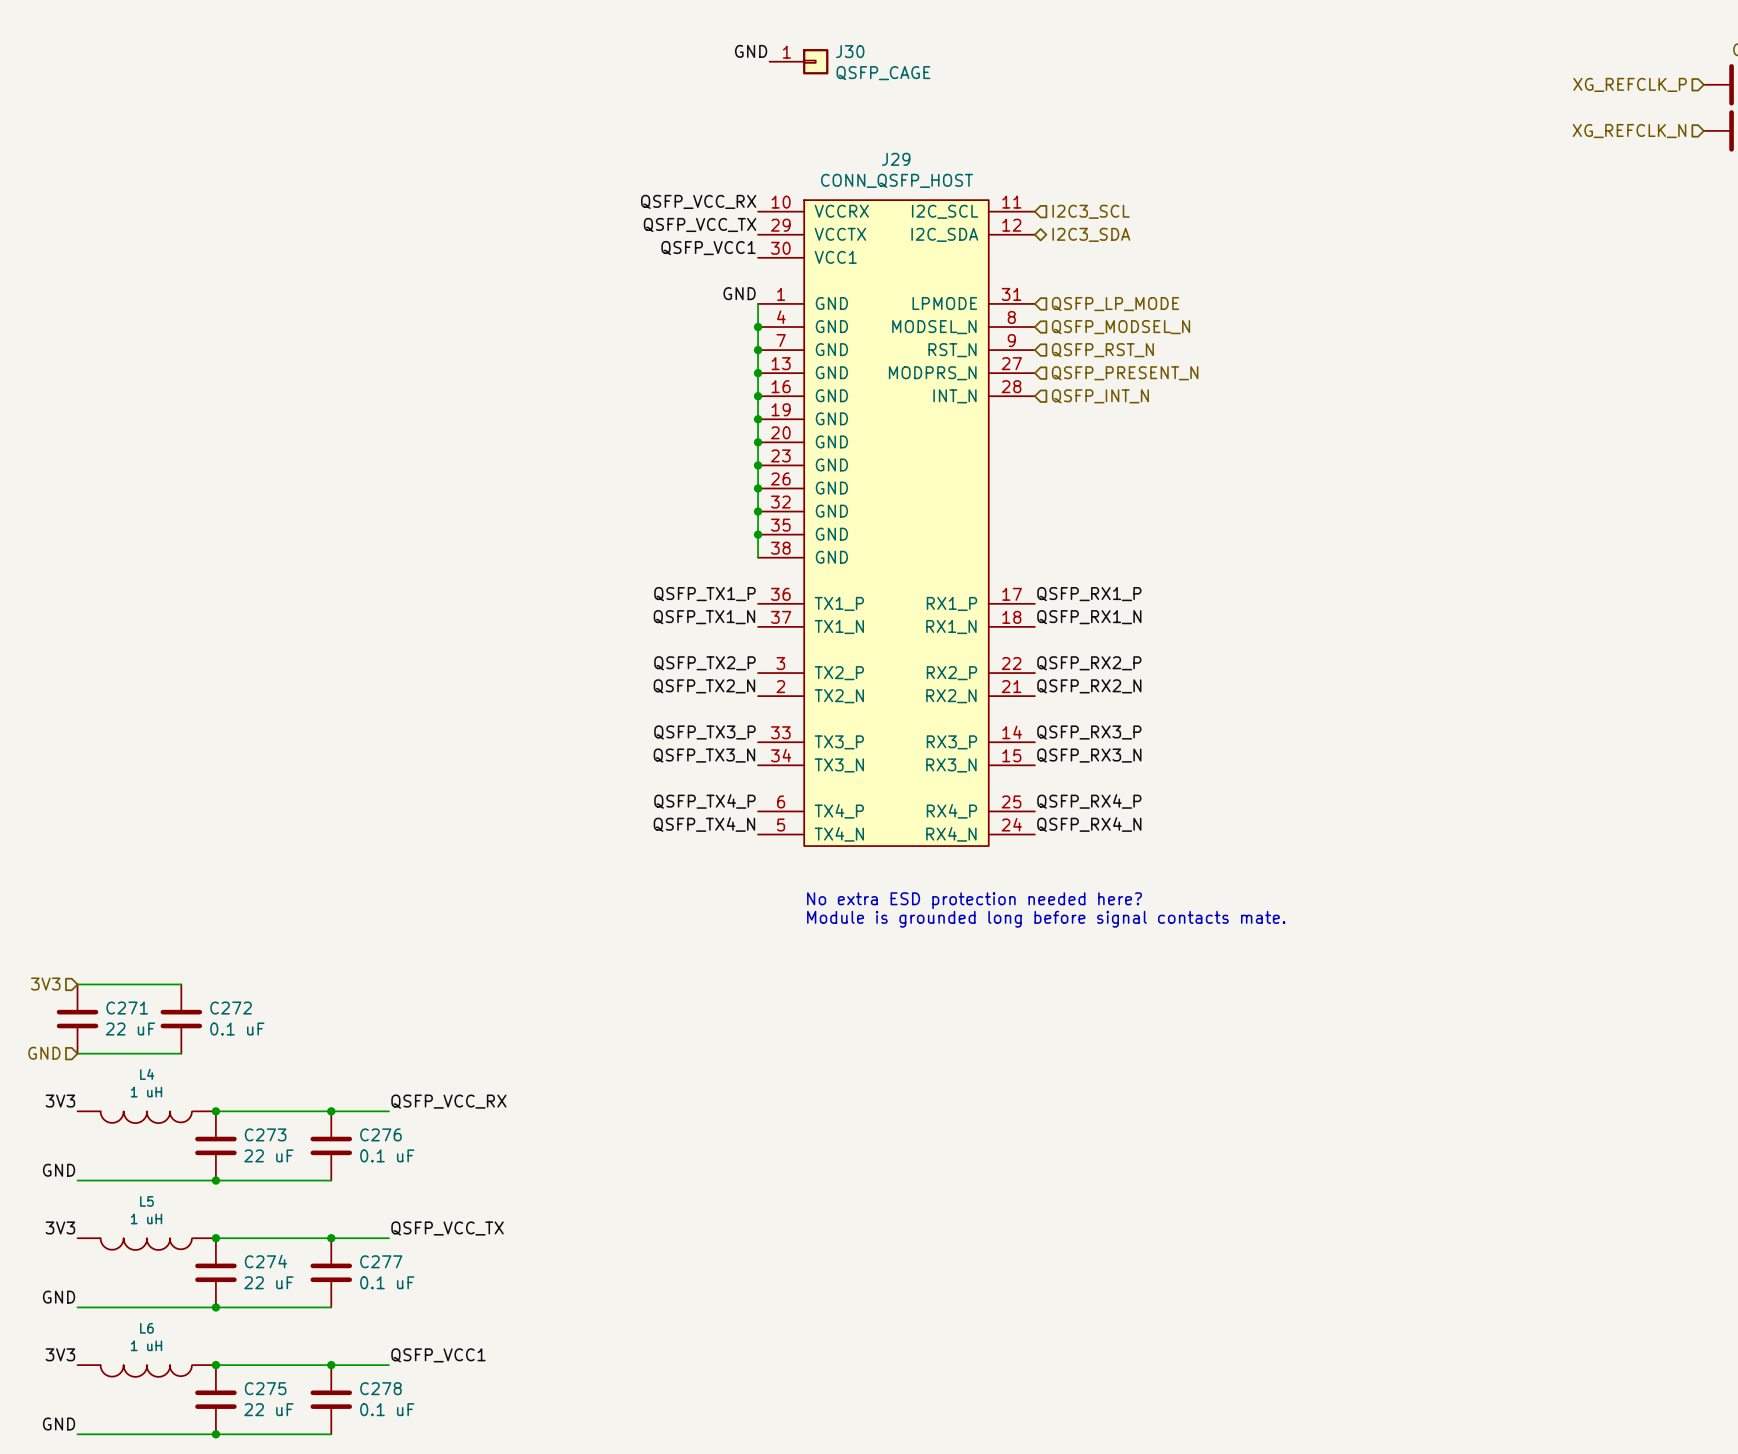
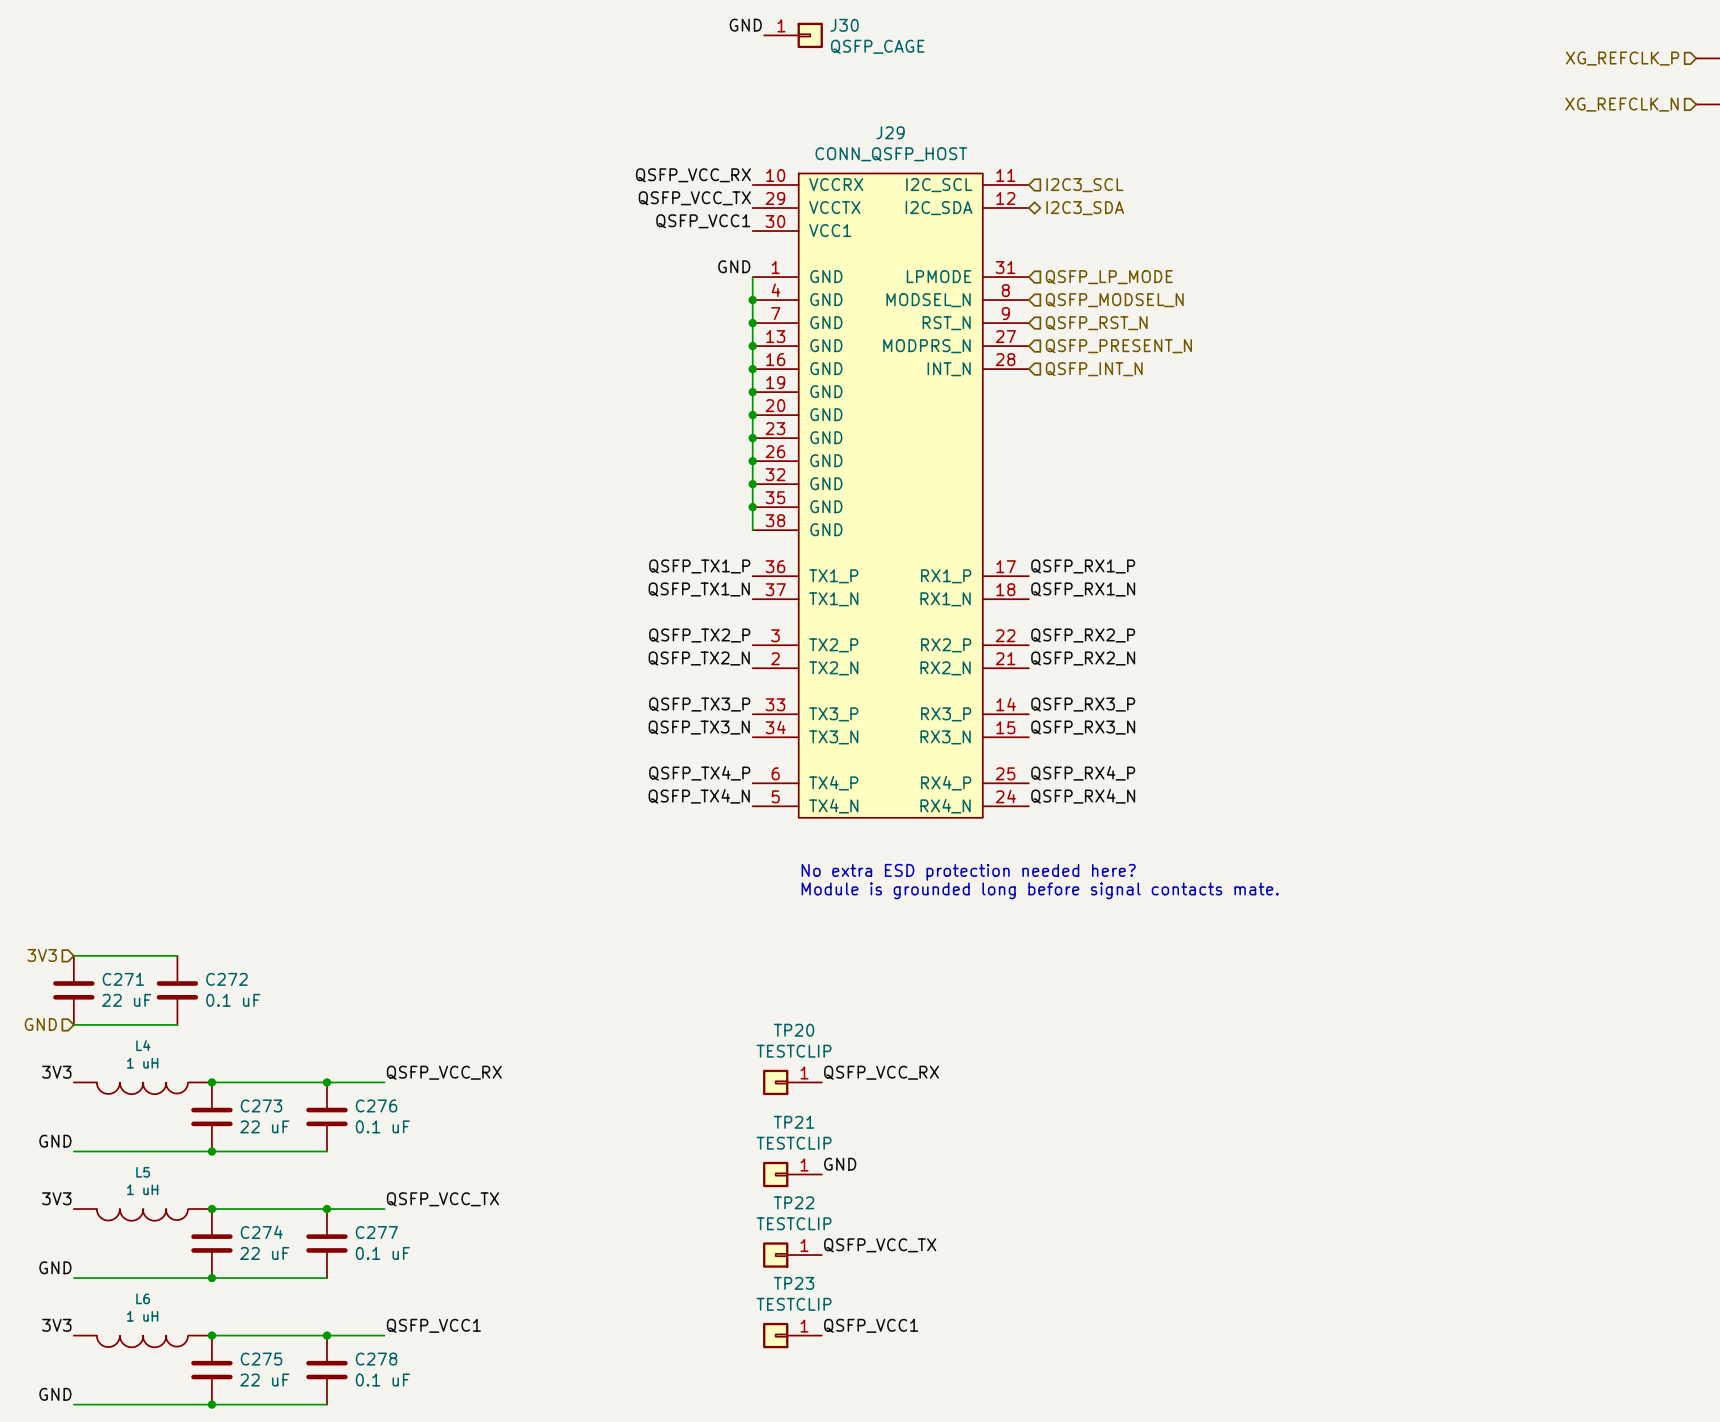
label: none -> QSFP_VCC_RX (881, 1072)
TP20: none -> TESTCLIP (792, 1082)
label: none -> GND (840, 1164)
TP21: none -> TESTCLIP (792, 1174)
label: none -> QSFP_VCC_TX (880, 1245)
TP22: none -> TESTCLIP (792, 1255)
label: none -> QSFP_VCC1 (871, 1325)
TP23: none -> TESTCLIP (792, 1335)

